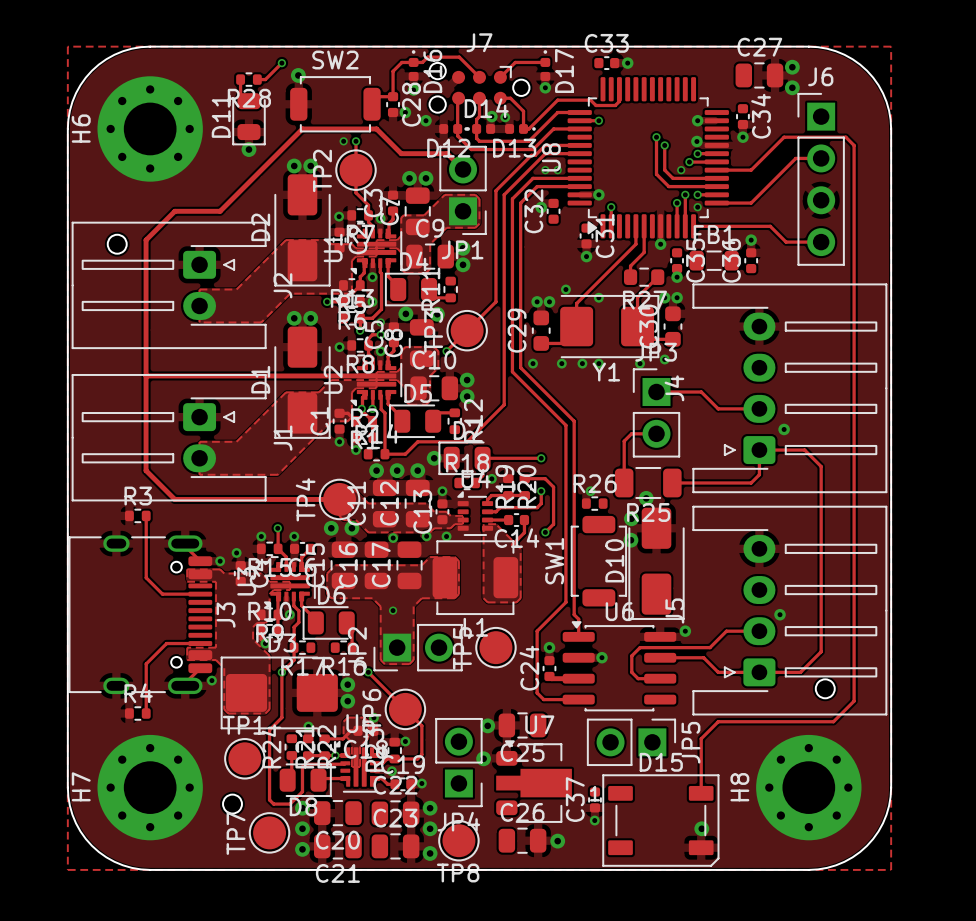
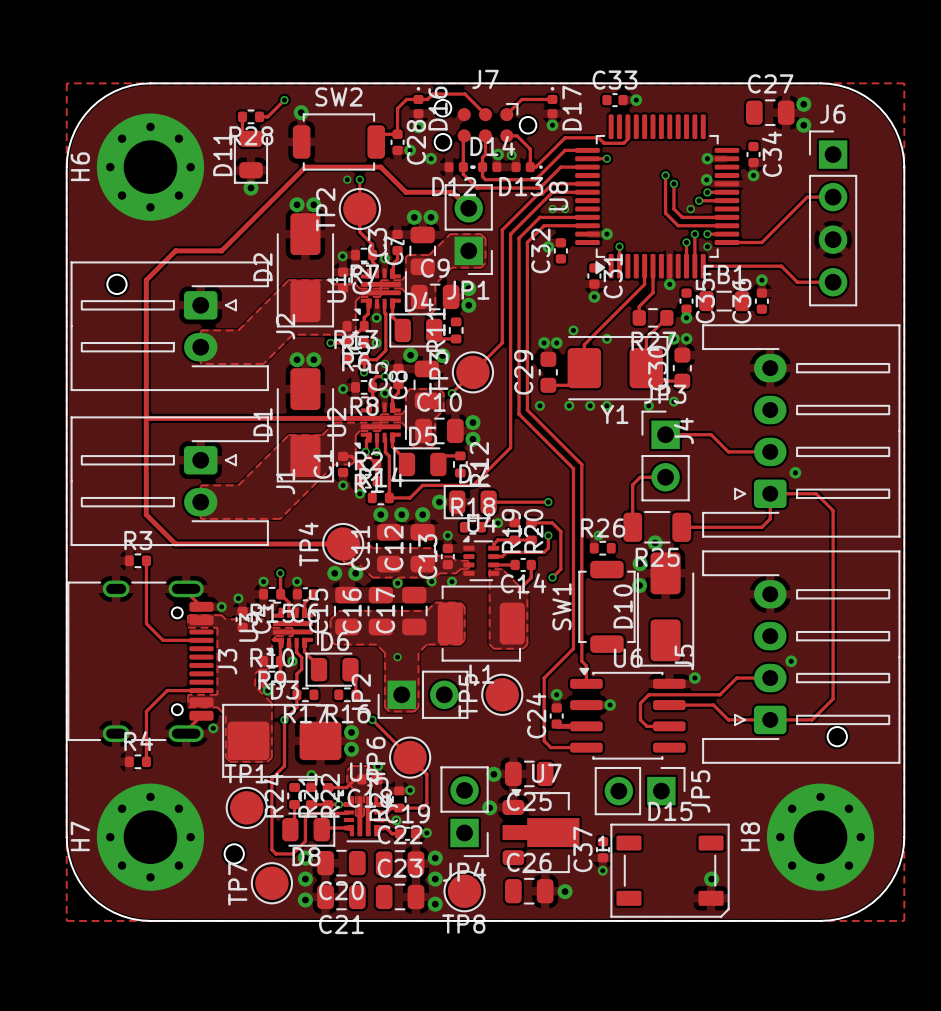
track: (716, 170) (751, 170) (784, 137) (845, 137) (854, 145) (854, 701) (833, 721) (718, 721) (701, 738) (701, 793) -> none

